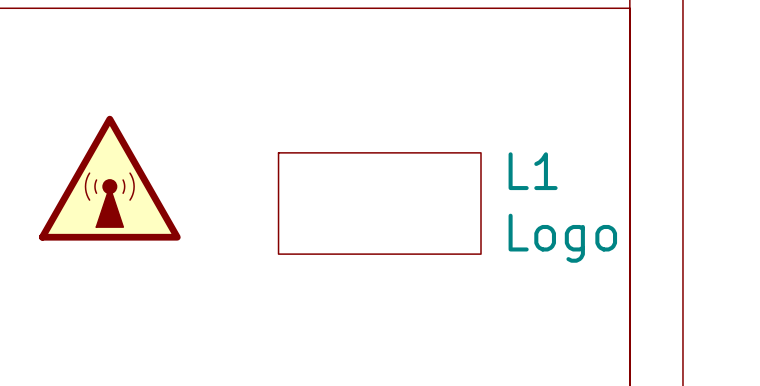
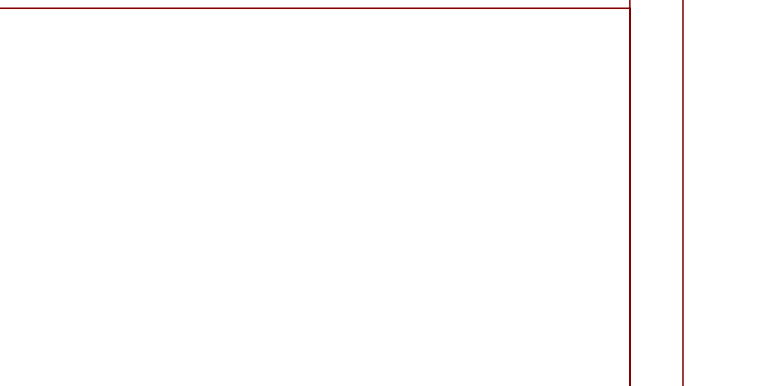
power symbol: (109, 178) -> none
L1: Logo (379, 203) -> none

